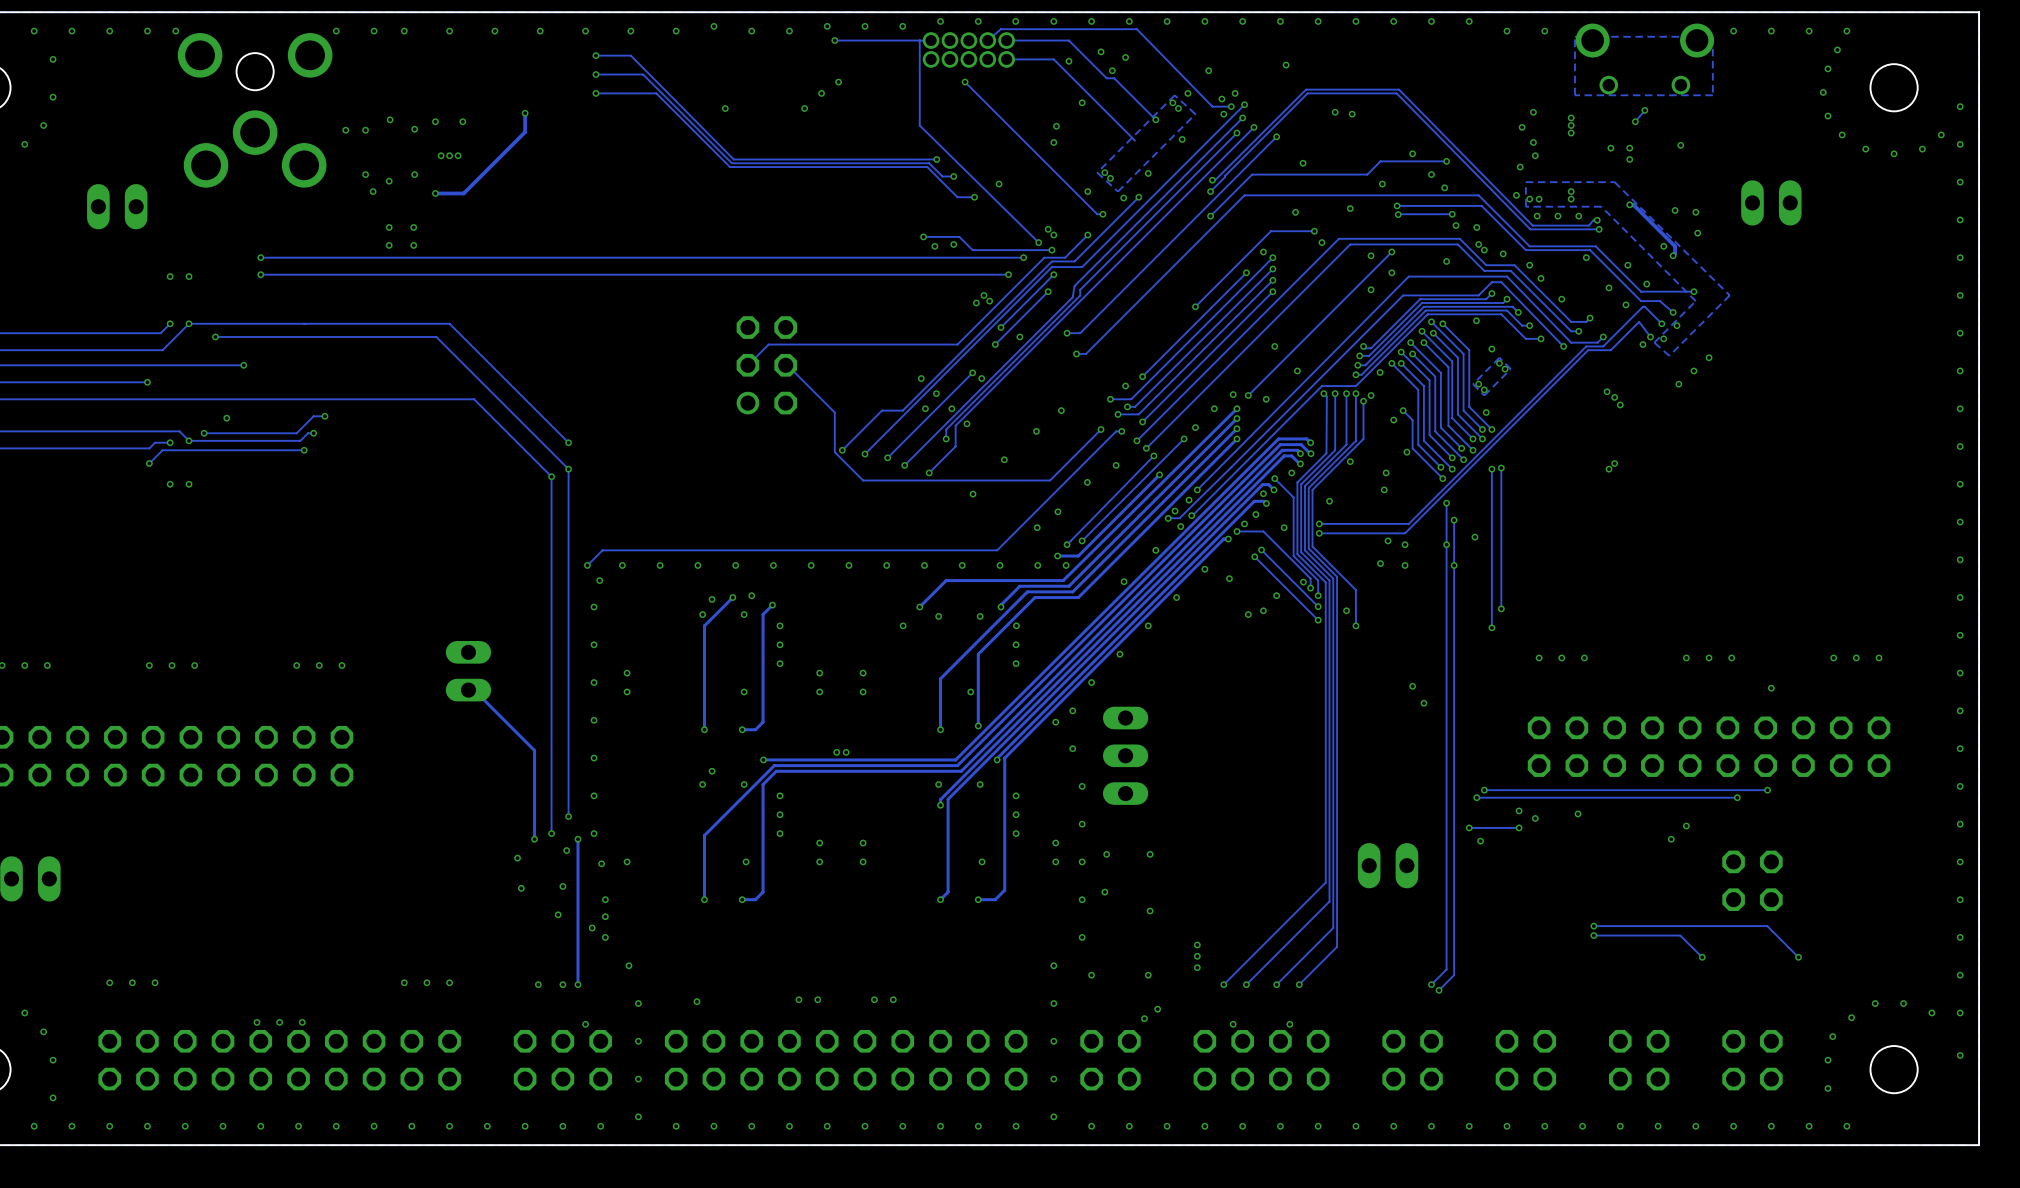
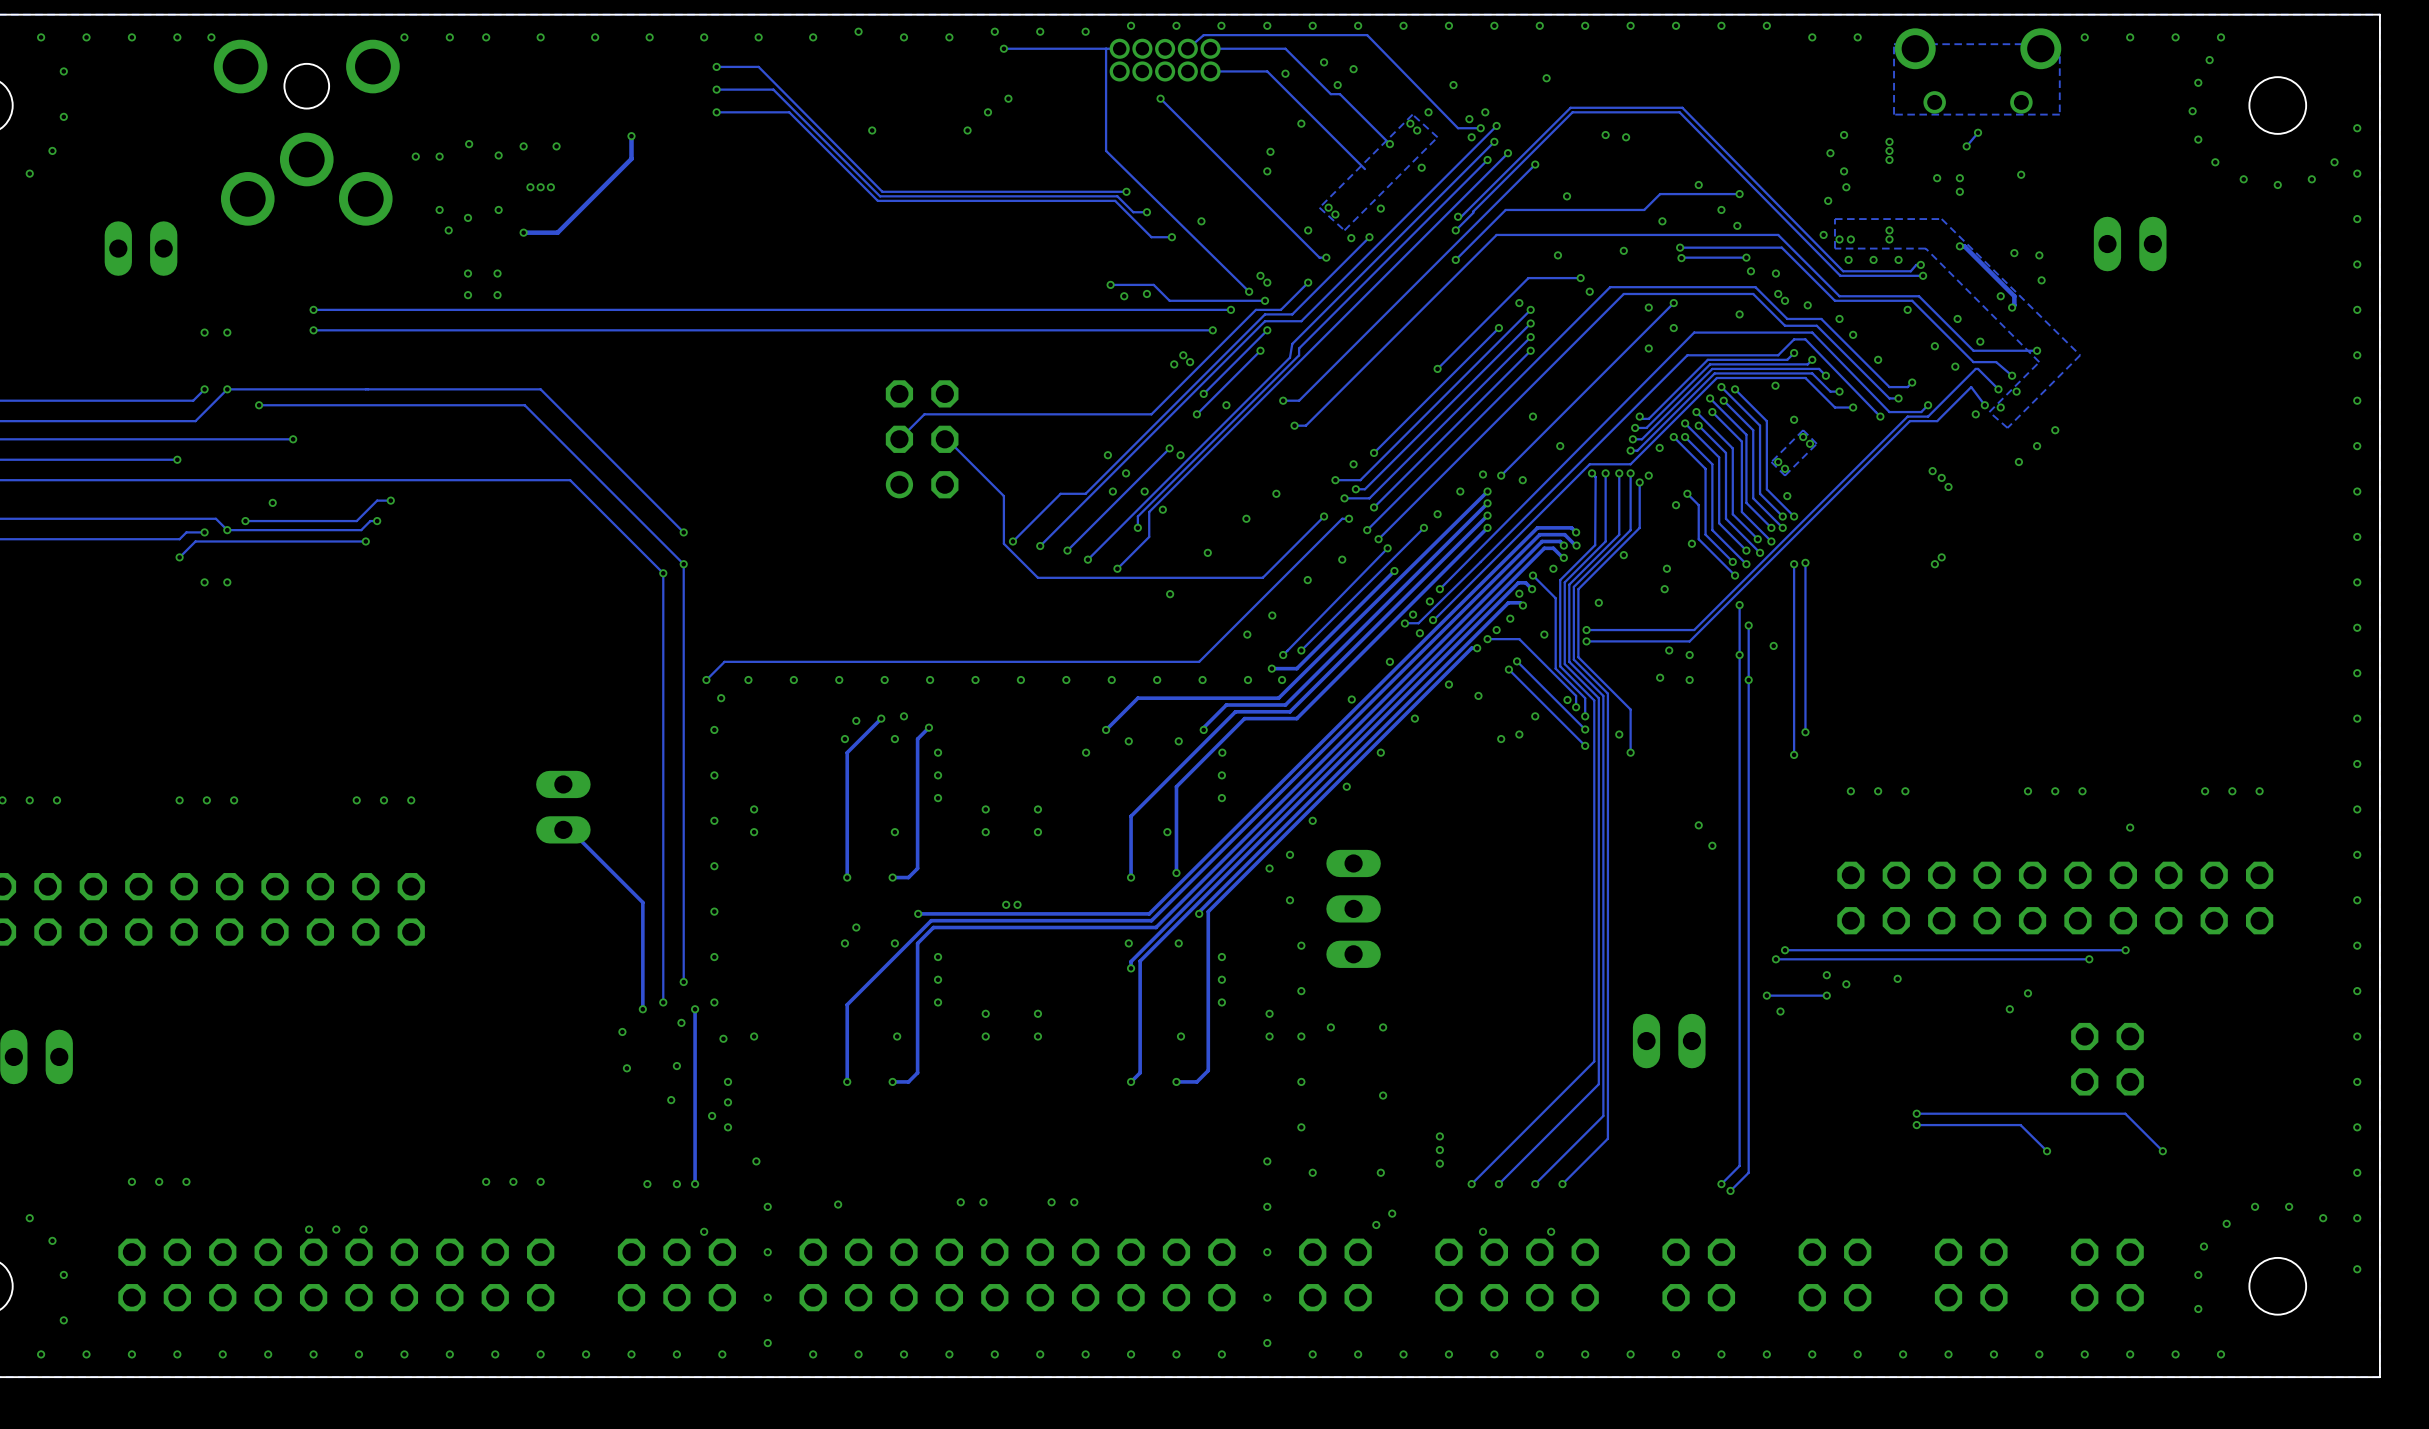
via: (1104, 892) -> none

